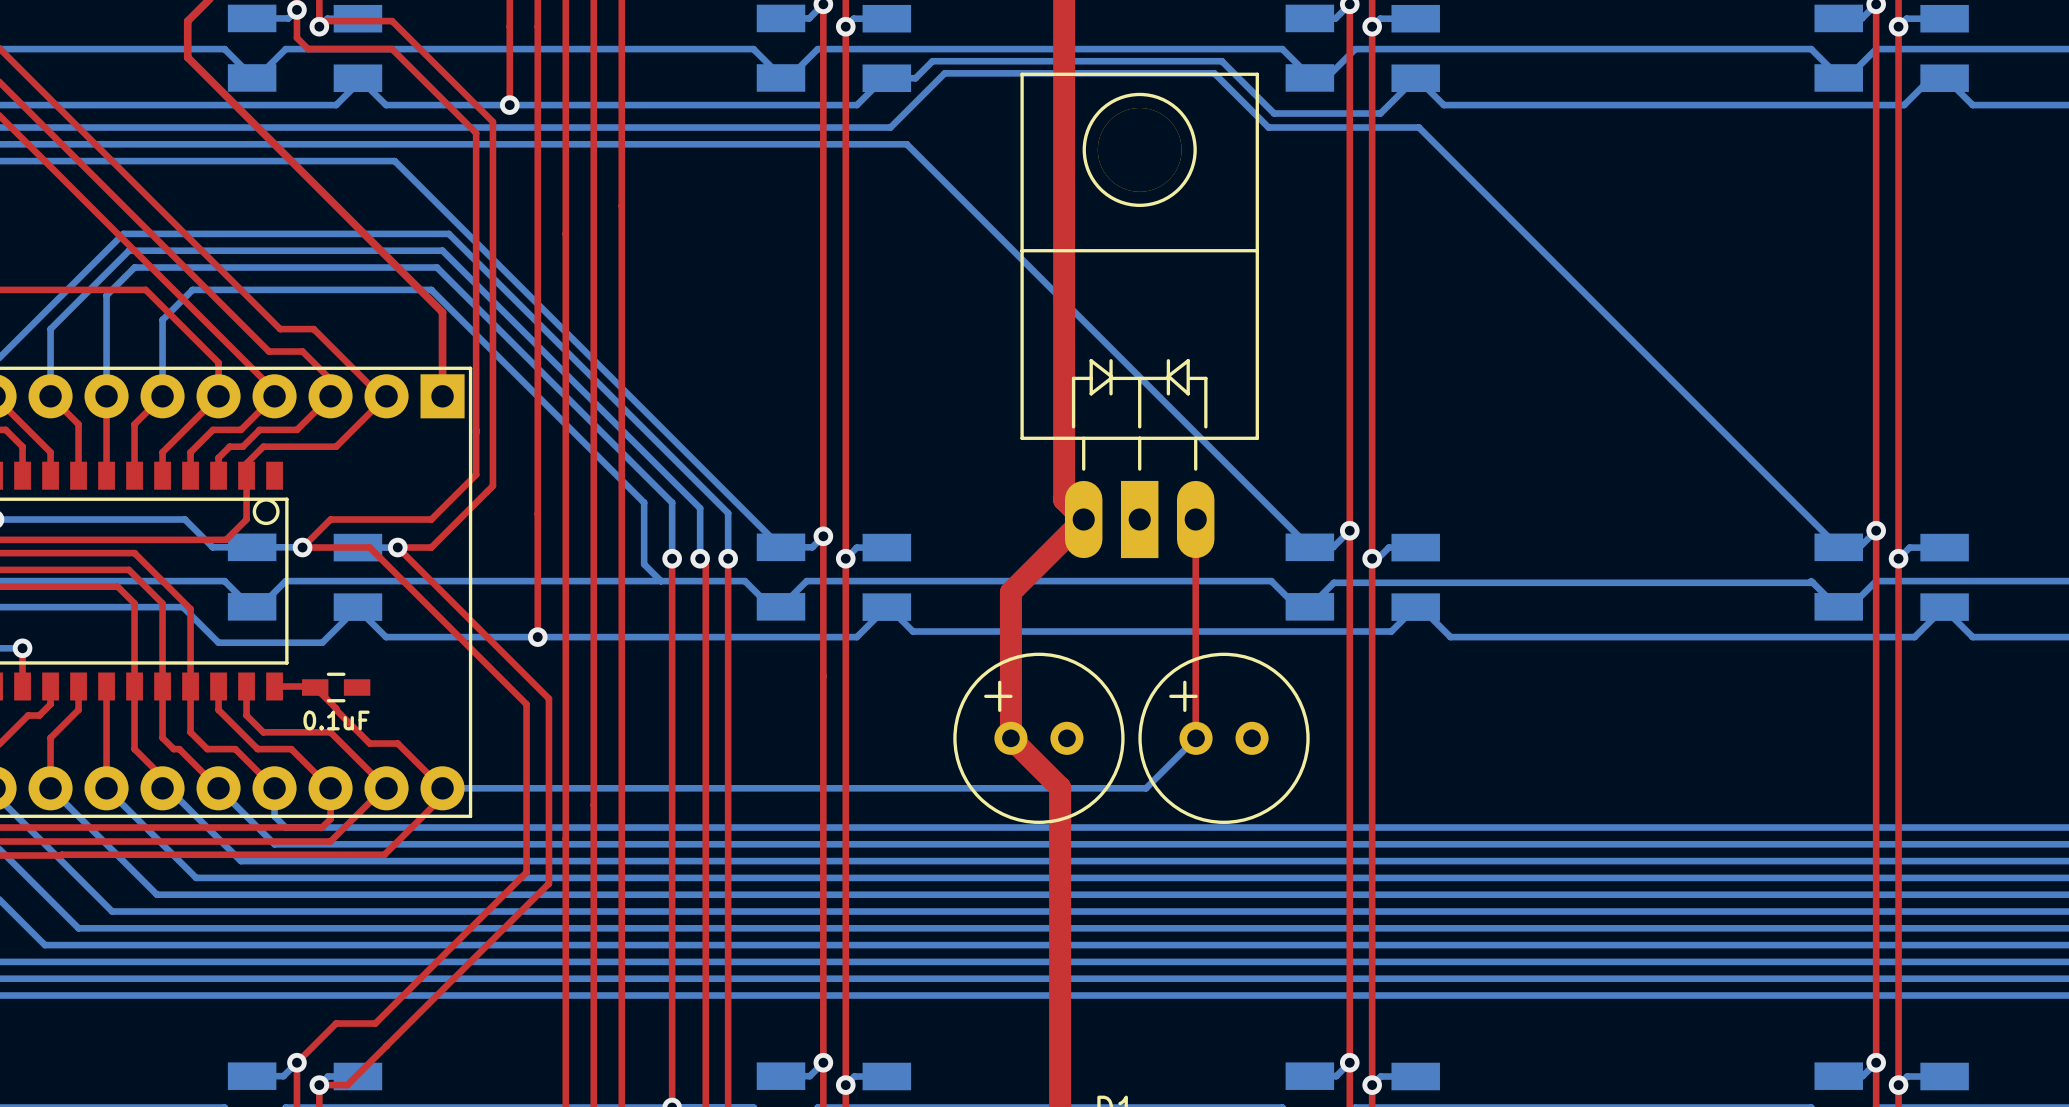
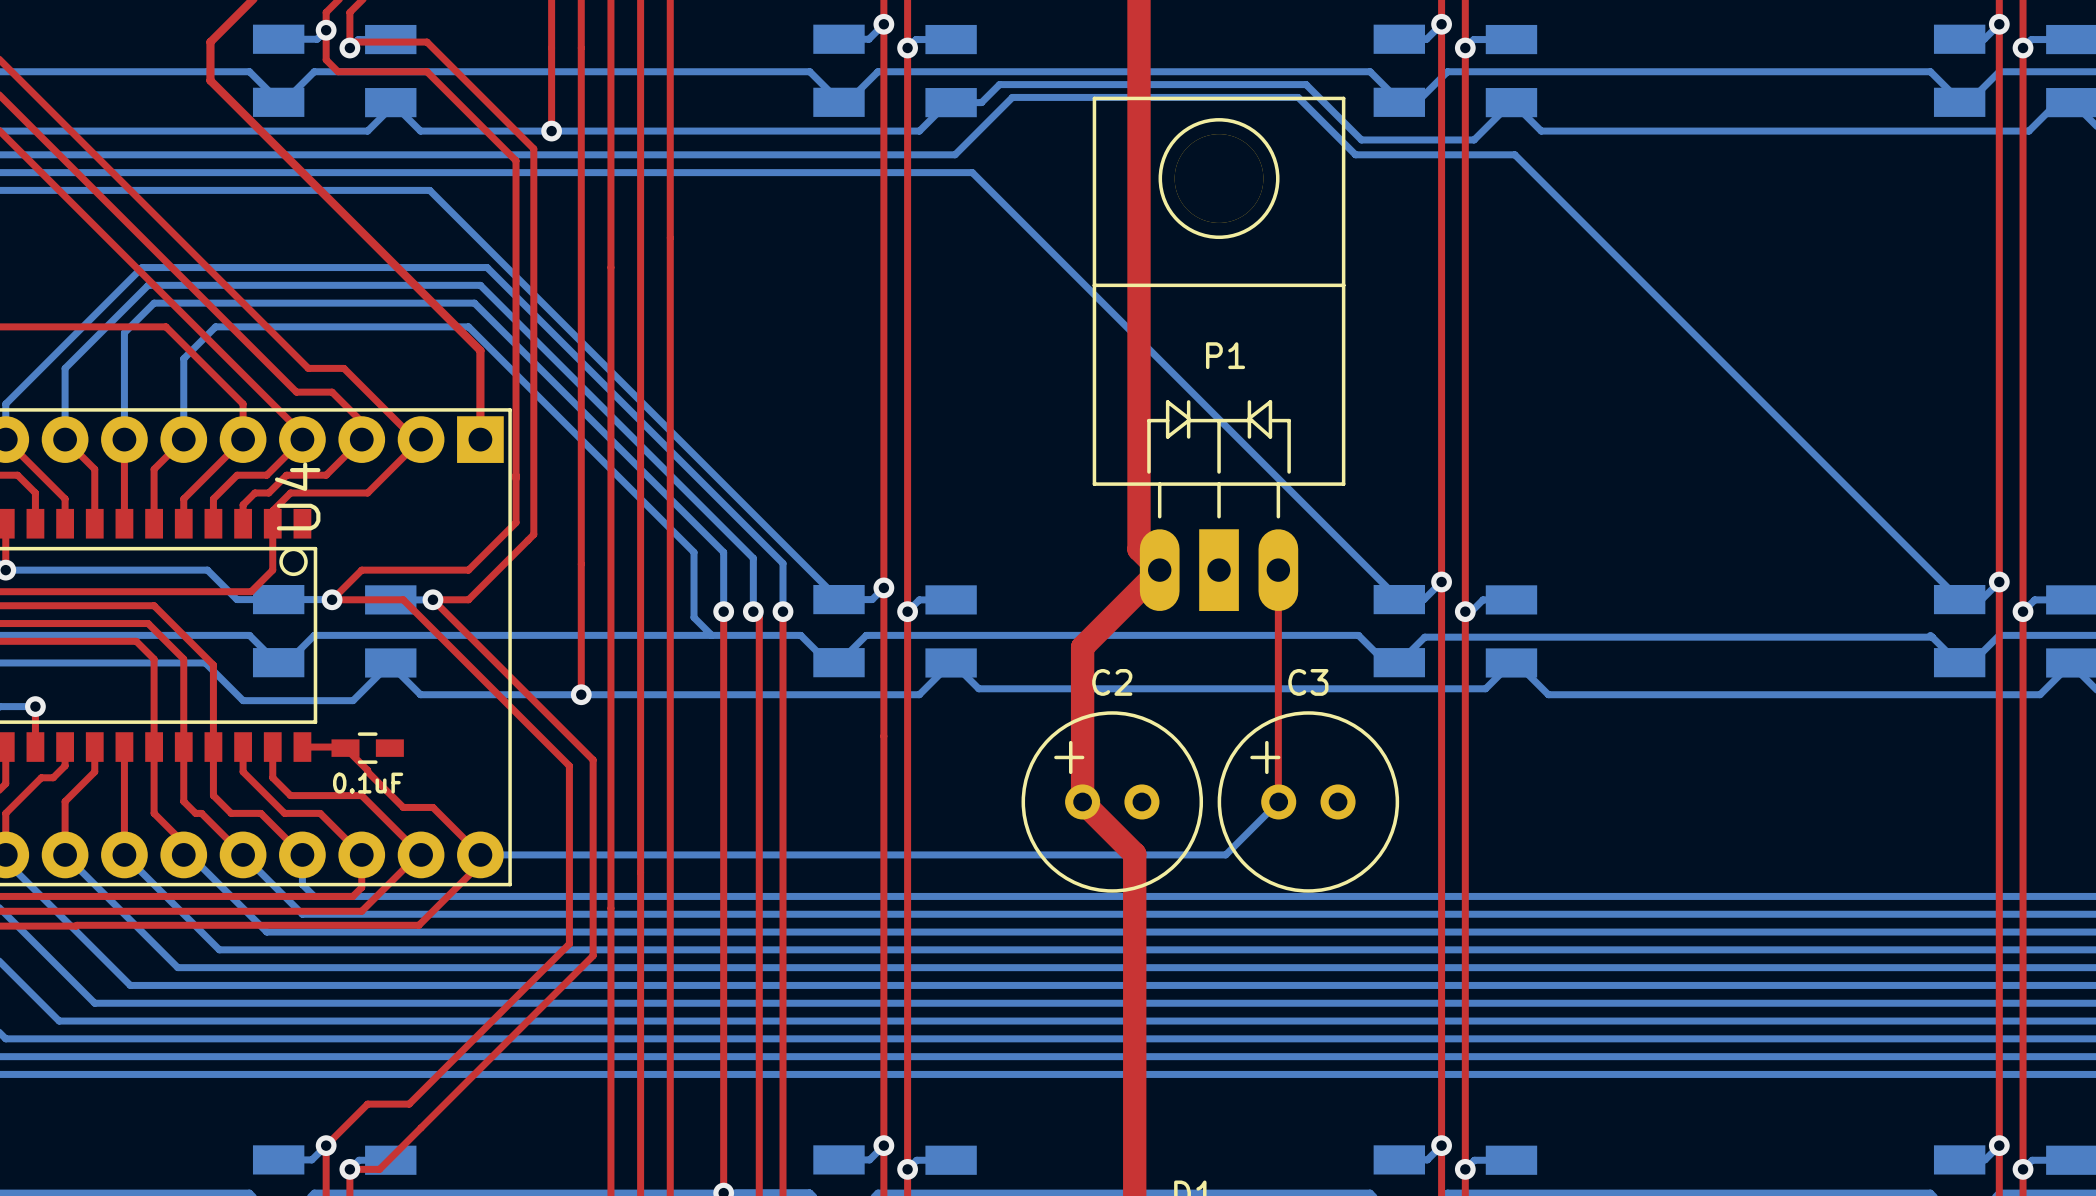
P1 name: none -> P1 (1225, 355)
U4 name: none -> U4 (297, 496)
C2 name: none -> C2 (1112, 682)
C3 name: none -> C3 (1308, 682)

